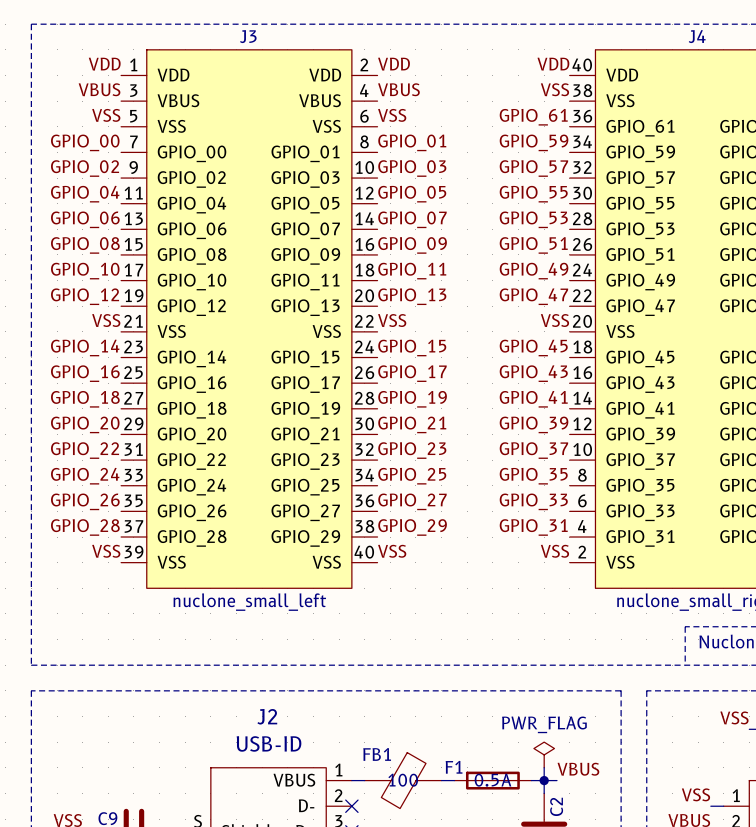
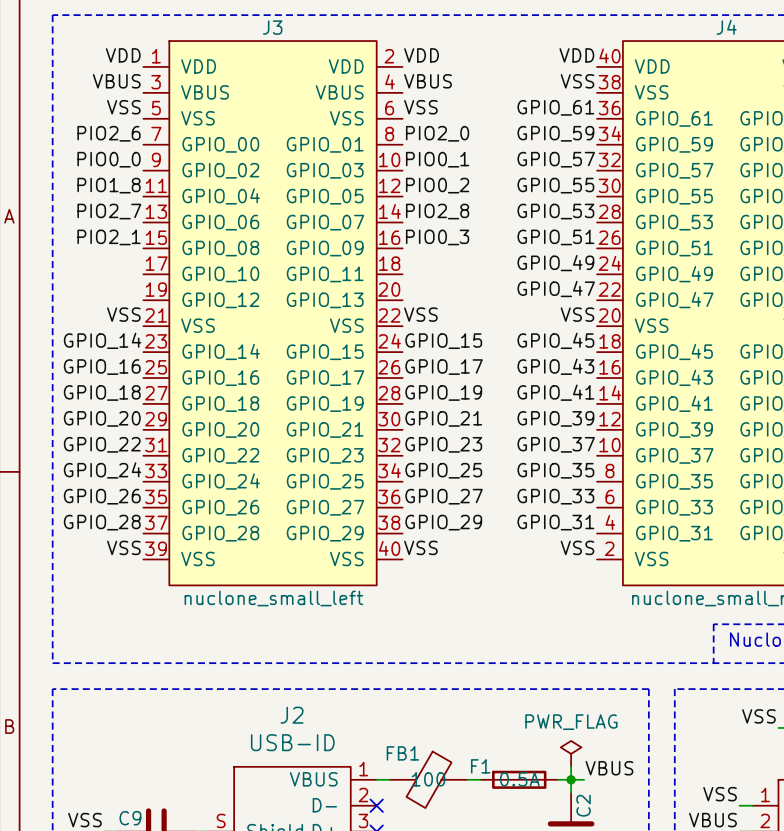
label: GPIO_00 (85, 142) -> PIO2_6 (109, 133)
label: GPIO_01 (412, 142) -> PIO2_0 (437, 133)
label: GPIO_02 (85, 168) -> PIO0_0 (109, 159)
label: GPIO_03 (412, 168) -> PIO0_1 (437, 159)
label: GPIO_04 (85, 194) -> PIO1_8 (109, 185)
label: GPIO_05 (412, 194) -> PIO0_2 (437, 185)
label: GPIO_06 (85, 219) -> PIO2_7 (109, 211)
label: GPIO_07 (412, 219) -> PIO2_8 (437, 211)
label: GPIO_08 (85, 245) -> PIO2_1 (109, 237)
label: GPIO_09 (412, 245) -> PIO0_3 (437, 237)
label: GPIO_10 (85, 271) -> none
label: GPIO_11 (412, 271) -> none
label: GPIO_12 (85, 296) -> none
label: GPIO_13 (412, 296) -> none

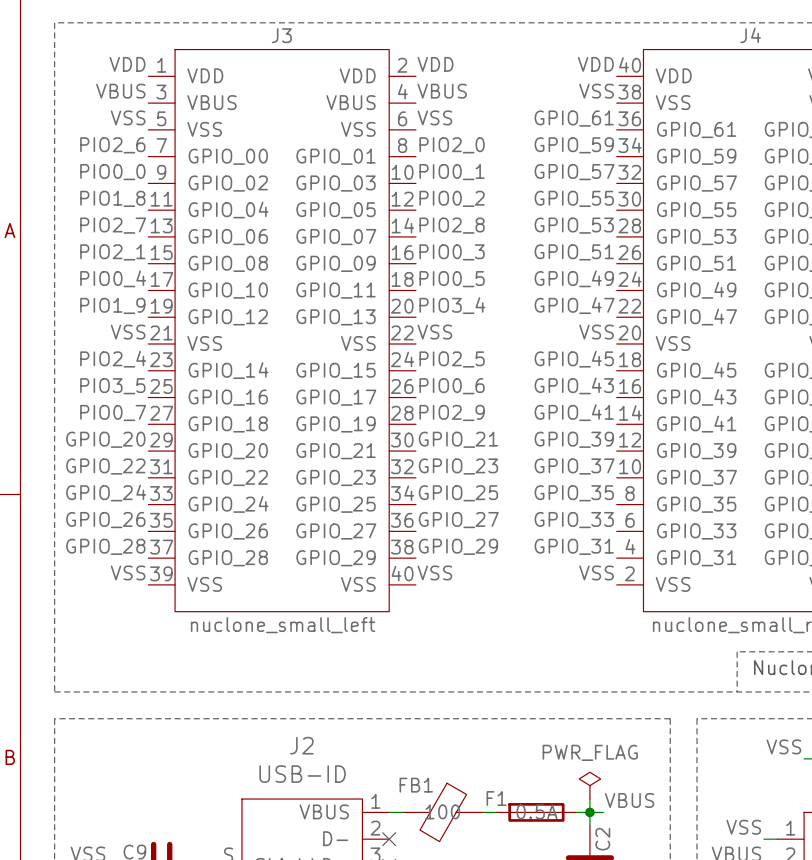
label: none -> PIO0_4 (113, 278)
label: none -> PIO0_5 (452, 279)
label: none -> PIO3_4 (452, 305)
label: none -> PIO1_9 (112, 305)
label: GPIO_14 (102, 340) -> PIO2_4 (113, 359)
label: GPIO_15 (443, 341) -> PIO2_5 (452, 359)
label: GPIO_16 (102, 367) -> PIO3_5 (112, 386)
label: GPIO_17 (444, 367) -> PIO0_6 (452, 386)
label: GPIO_18 (102, 392) -> PIO0_7 (113, 412)
label: GPIO_19 (443, 392) -> PIO2_9 (452, 412)

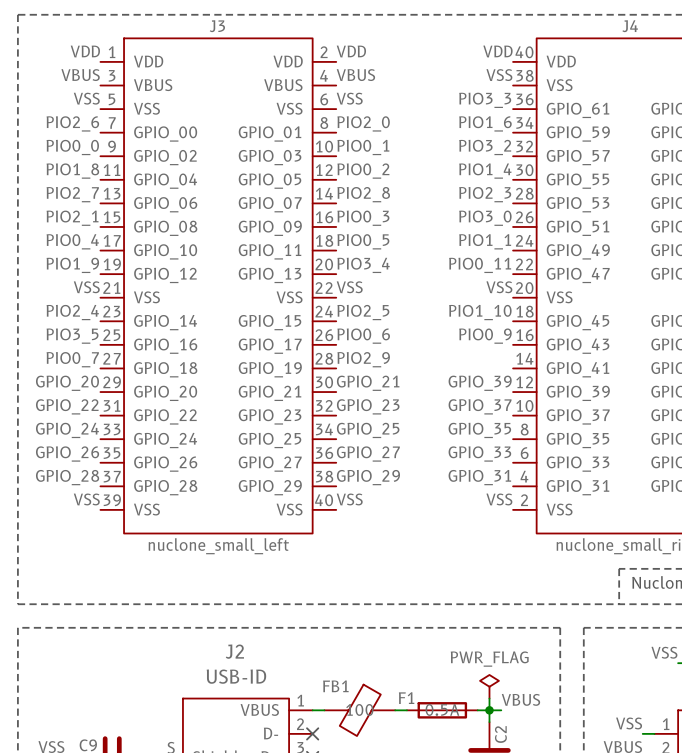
label: GPIO_61 (574, 118) -> PIO3_3 (485, 100)
label: GPIO_59 (574, 145) -> PIO1_6 (485, 123)
label: GPIO_57 (574, 172) -> PIO3_2 (485, 147)
label: GPIO_55 (574, 198) -> PIO1_4 (485, 171)
label: GPIO_53 (574, 225) -> PIO2_3 (485, 194)
label: GPIO_51 (574, 252) -> PIO3_0 (485, 218)
label: GPIO_49 (574, 278) -> PIO1_1 (485, 241)
label: GPIO_47 (574, 305) -> PIO0_11 (480, 265)
label: GPIO_45 (574, 359) -> PIO1_10 (480, 312)
label: GPIO_43 (574, 385) -> PIO0_9 (485, 336)
label: GPIO_41 (574, 412) -> none

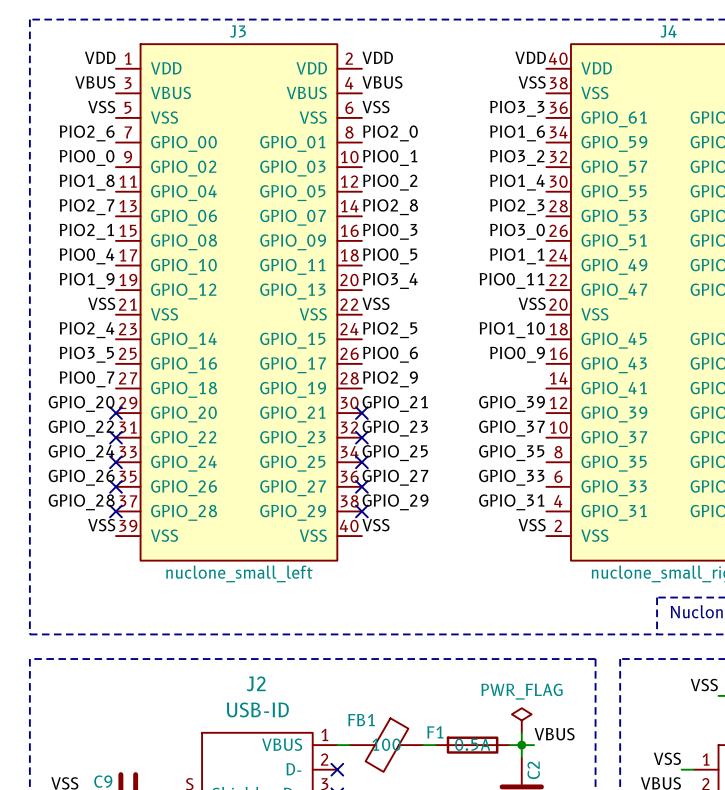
no-connect mark: none -> (115, 413)
no-connect mark: none -> (361, 413)
no-connect mark: none -> (115, 437)
no-connect mark: none -> (361, 437)
no-connect mark: none -> (115, 462)
no-connect mark: none -> (361, 462)
no-connect mark: none -> (115, 486)
no-connect mark: none -> (361, 486)
no-connect mark: none -> (115, 511)
no-connect mark: none -> (361, 511)

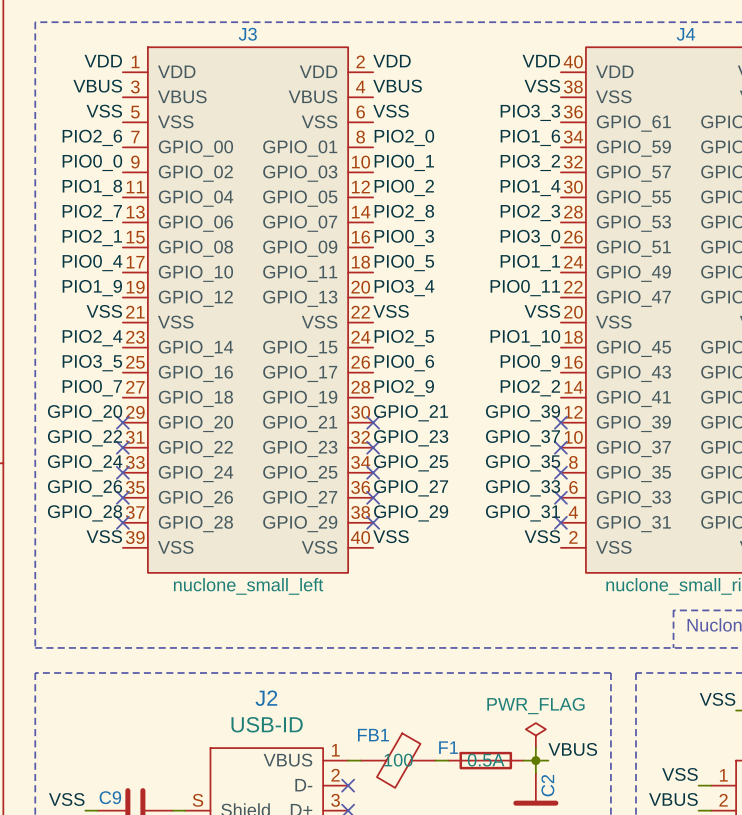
label: none -> PIO2_2 (530, 388)
no-connect mark: none -> (560, 422)
no-connect mark: none -> (560, 447)
no-connect mark: none -> (560, 472)
no-connect mark: none -> (560, 497)
no-connect mark: none -> (560, 522)

